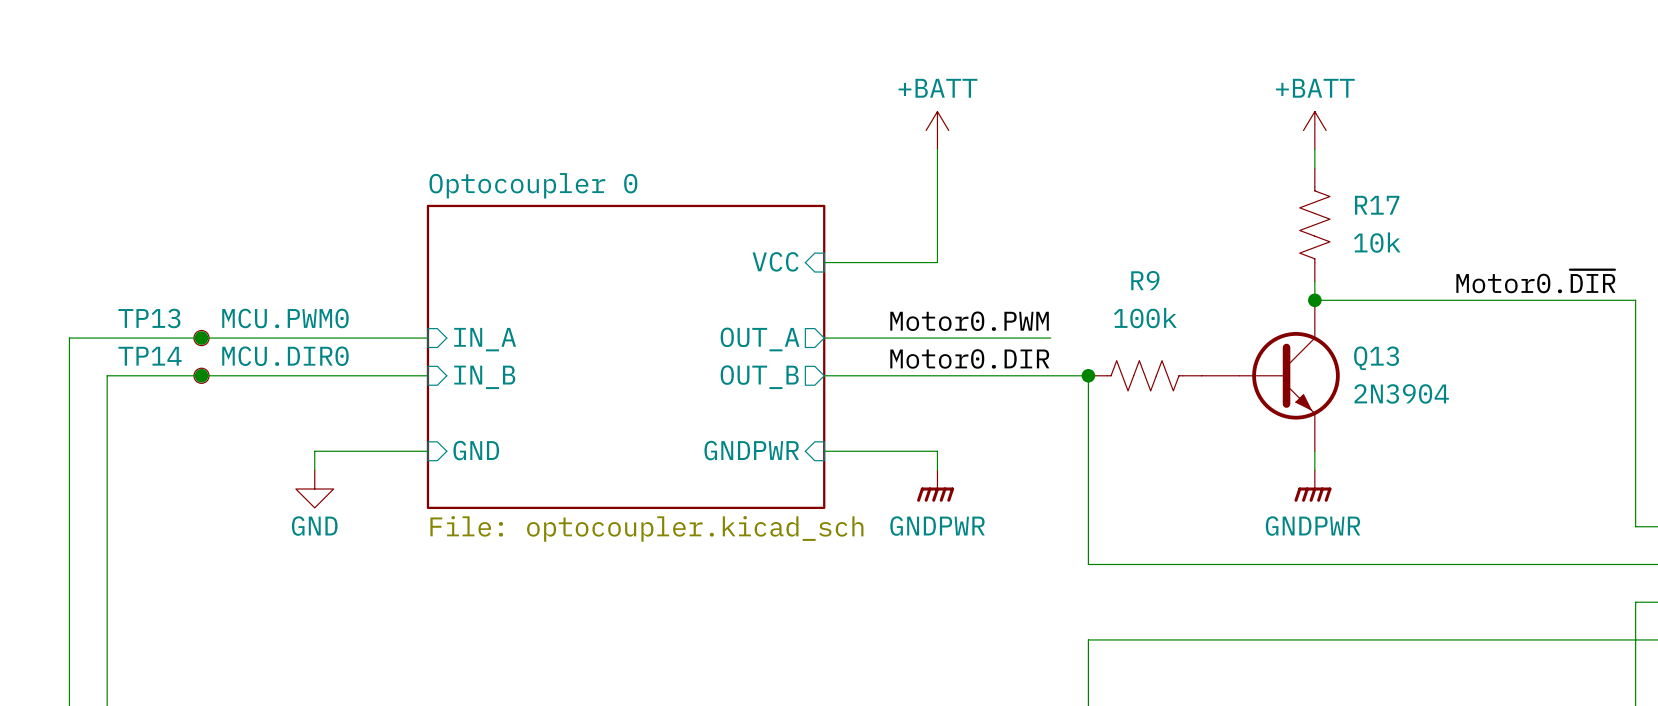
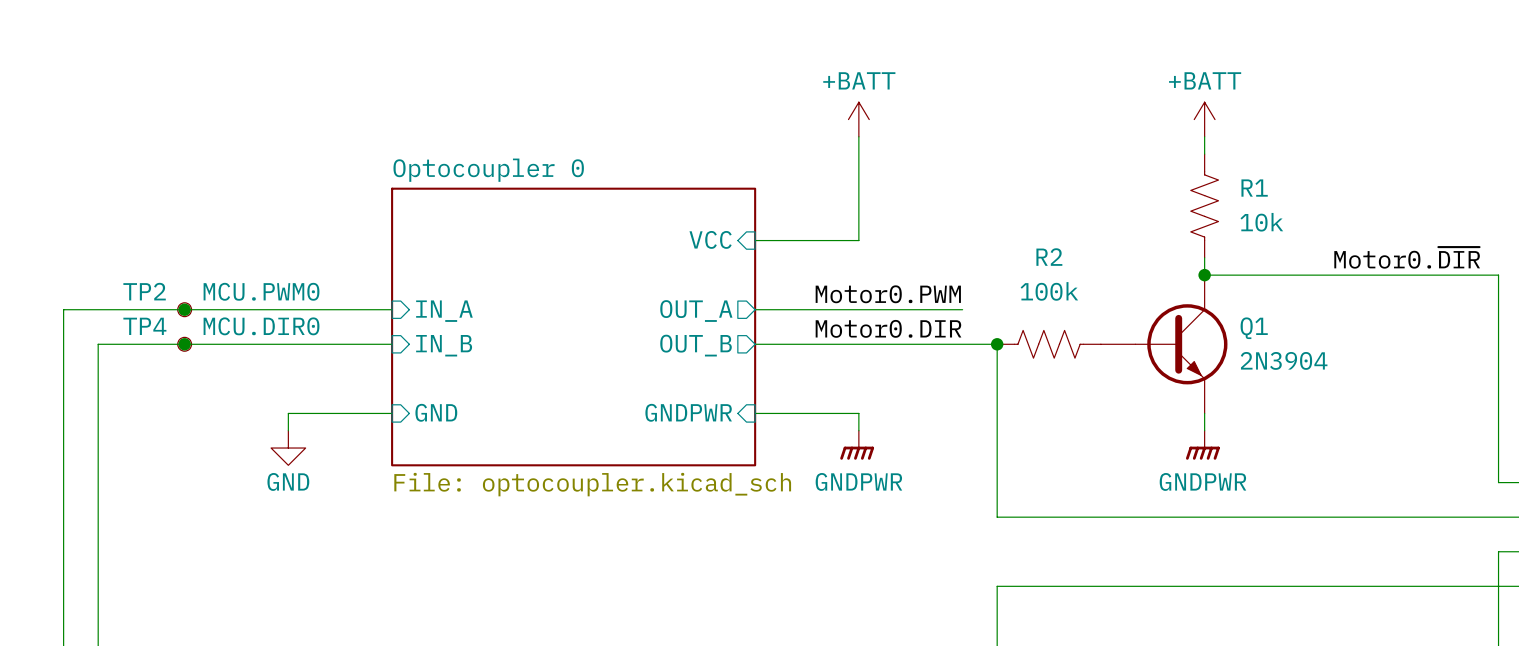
R17 name: R17 (1377, 205) -> R1 (1254, 188)
R9 name: R9 (1145, 280) -> R2 (1049, 257)
TP13 name: TP13 (149, 318) -> TP2 (144, 291)
TP14 name: TP14 (150, 356) -> TP4 (144, 326)
Q13 name: Q13 (1376, 358) -> Q1 (1254, 328)

